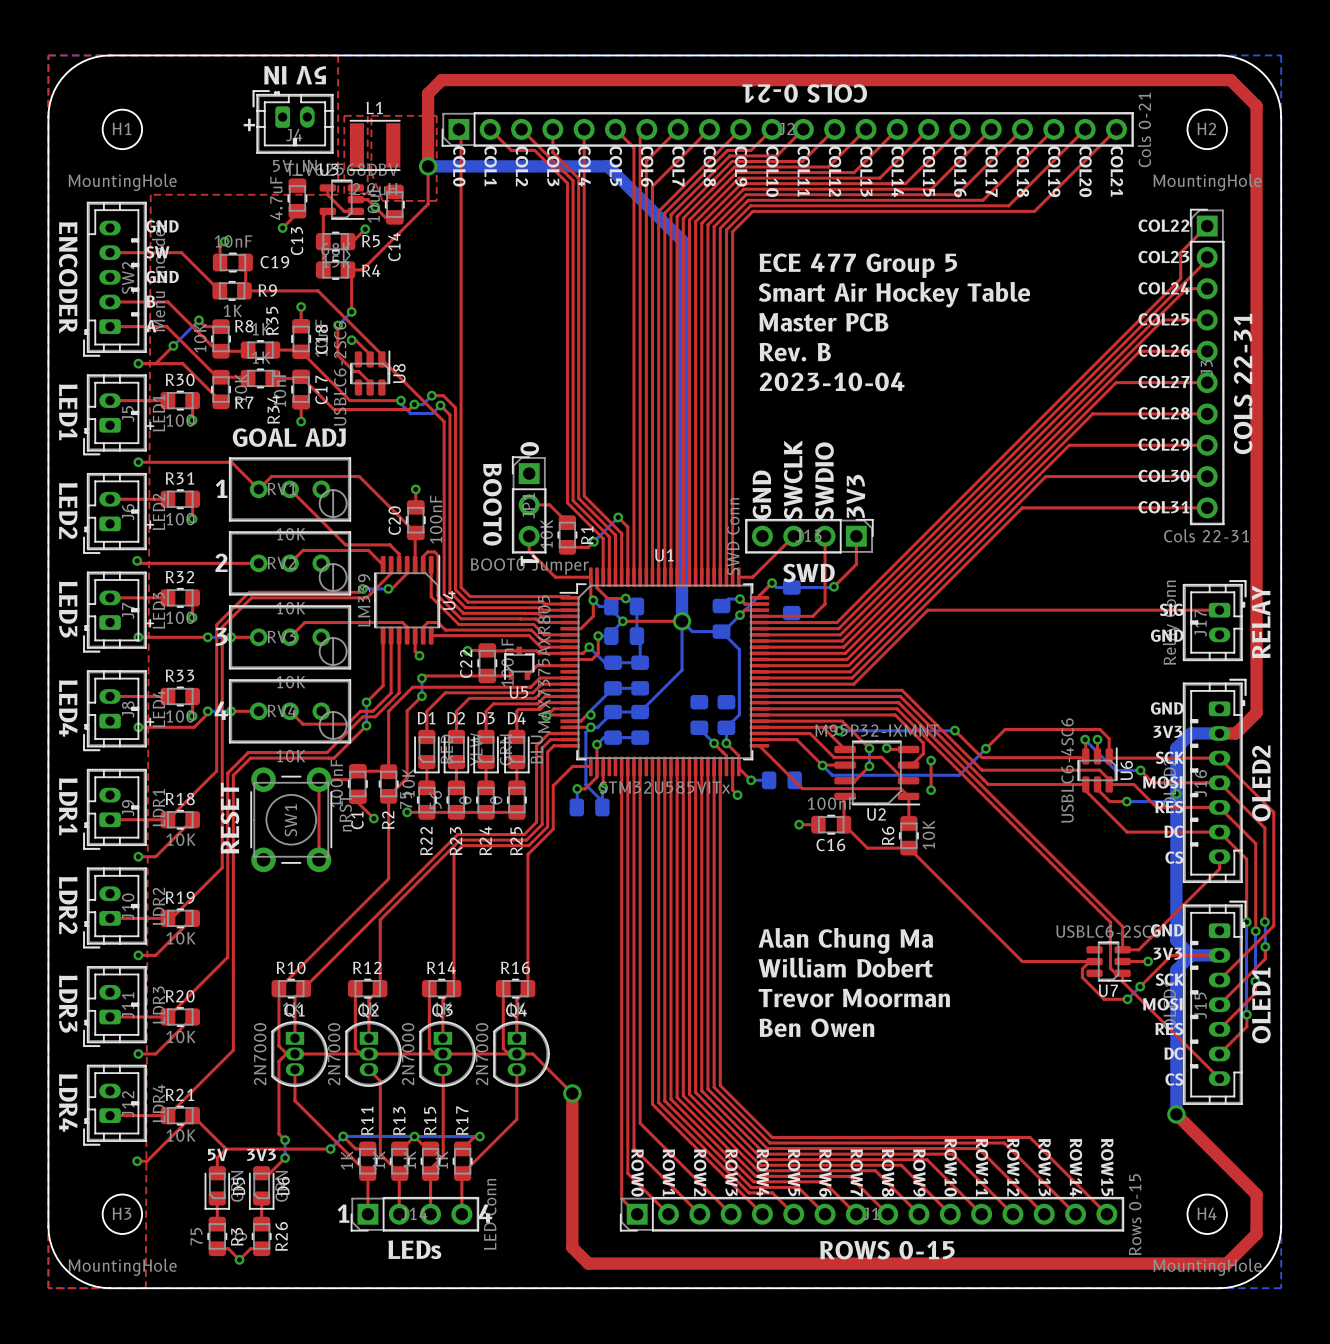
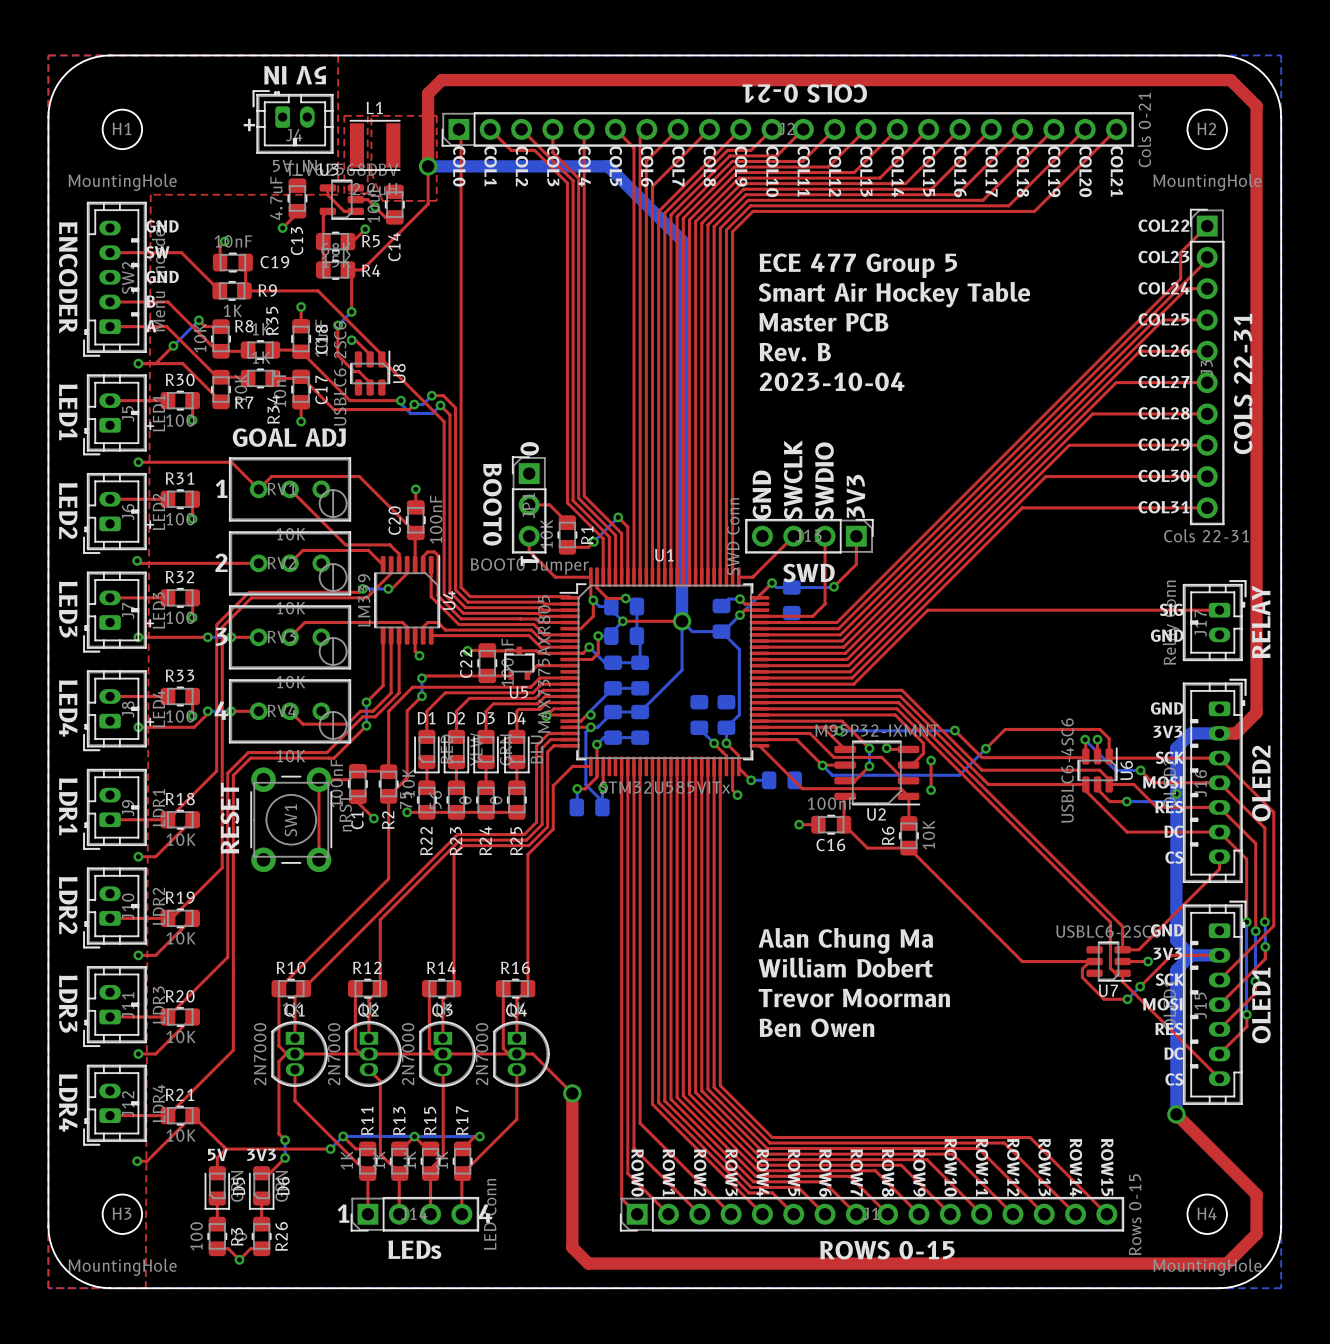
R3 value: 75 (196, 1236) -> 100 (196, 1236)

